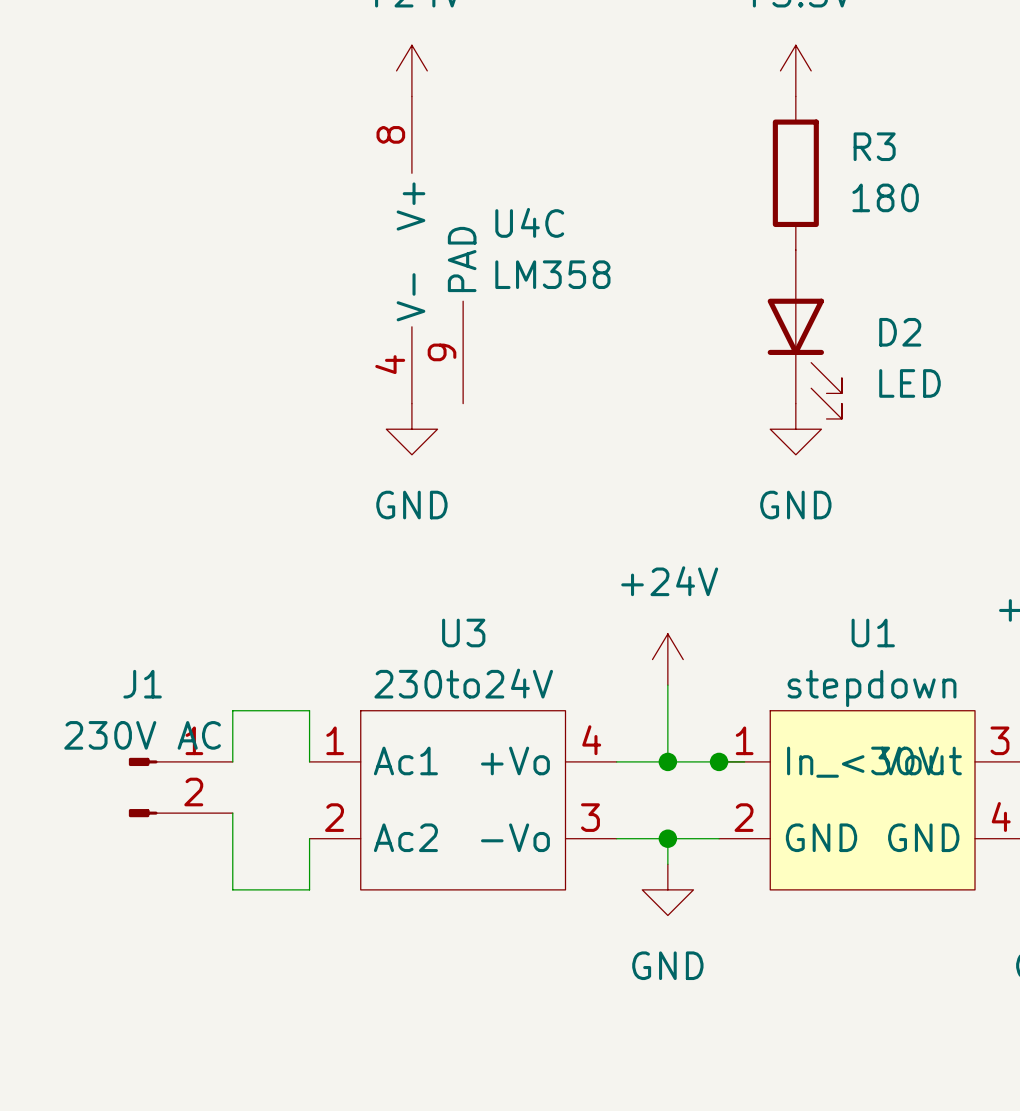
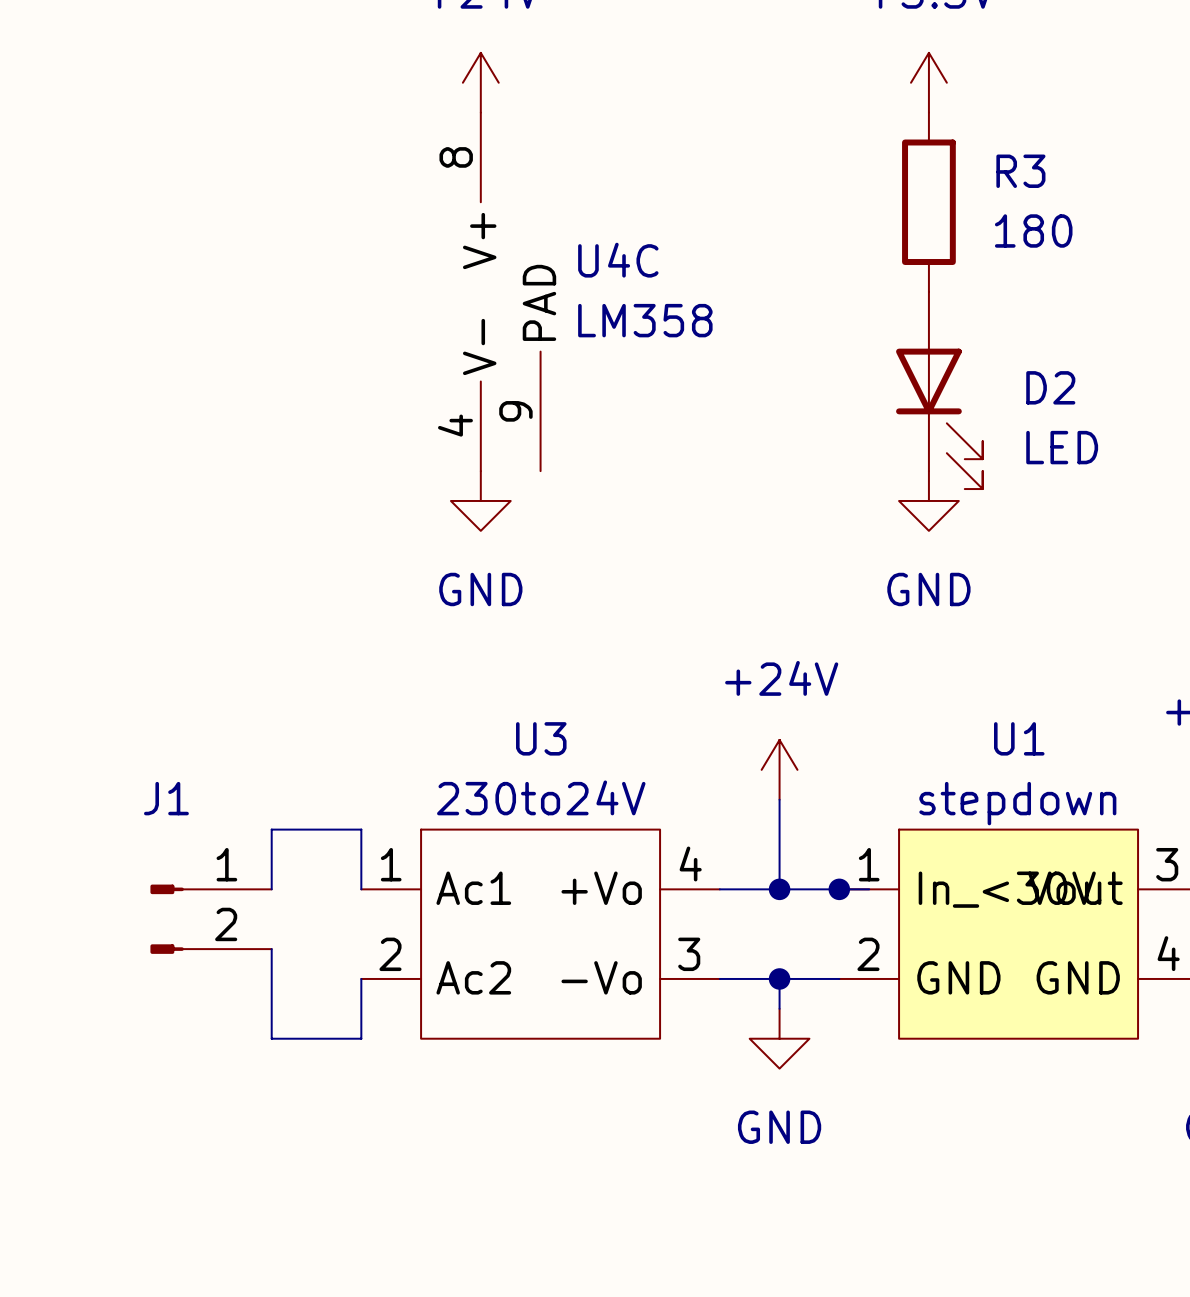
J1 value: 230V AC (142, 735) -> none

